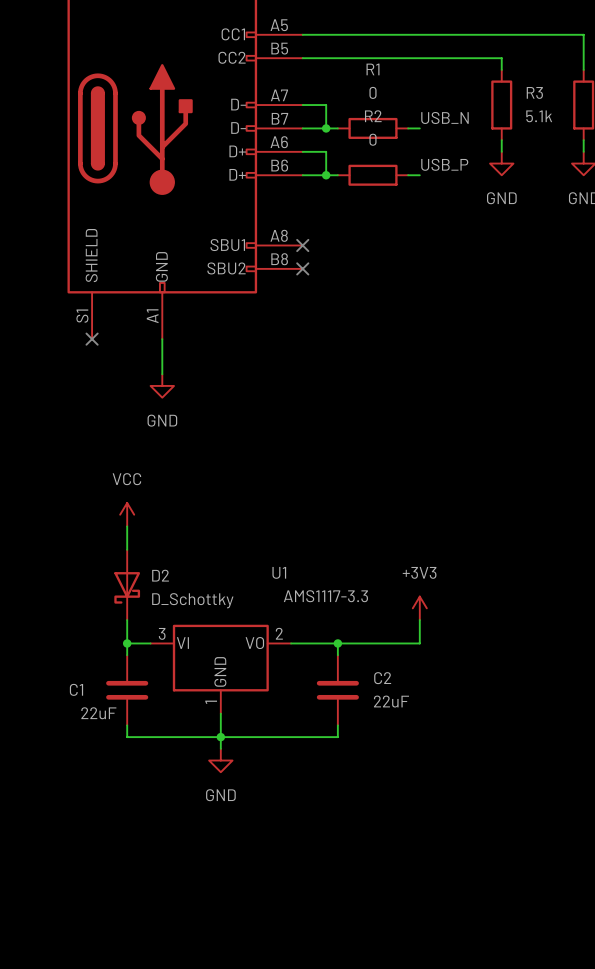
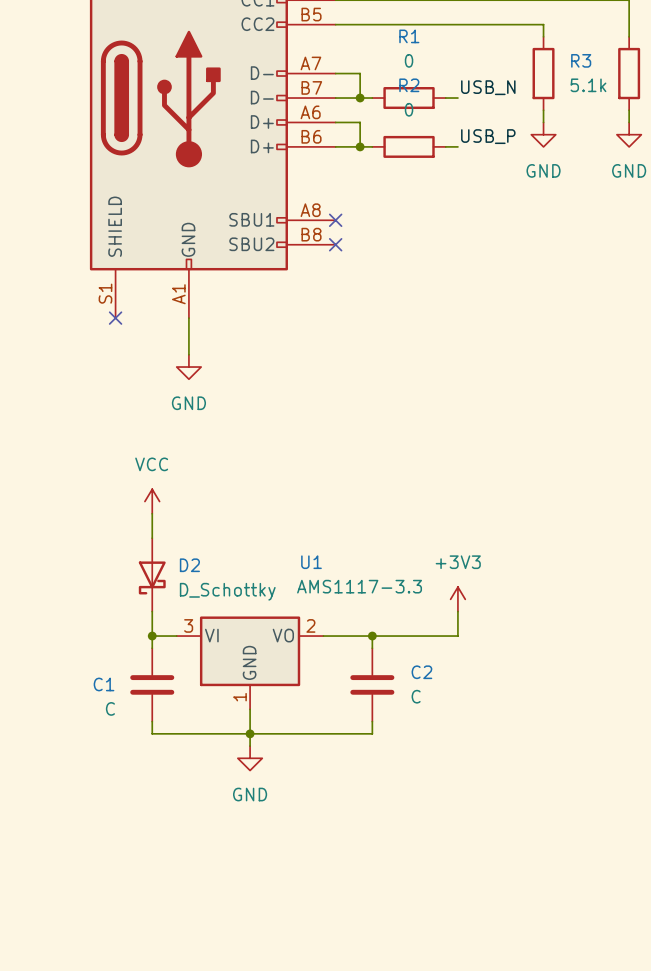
C2 value: 22uF (391, 701) -> C (416, 696)
C1 value: 22uF (98, 713) -> C (110, 708)

